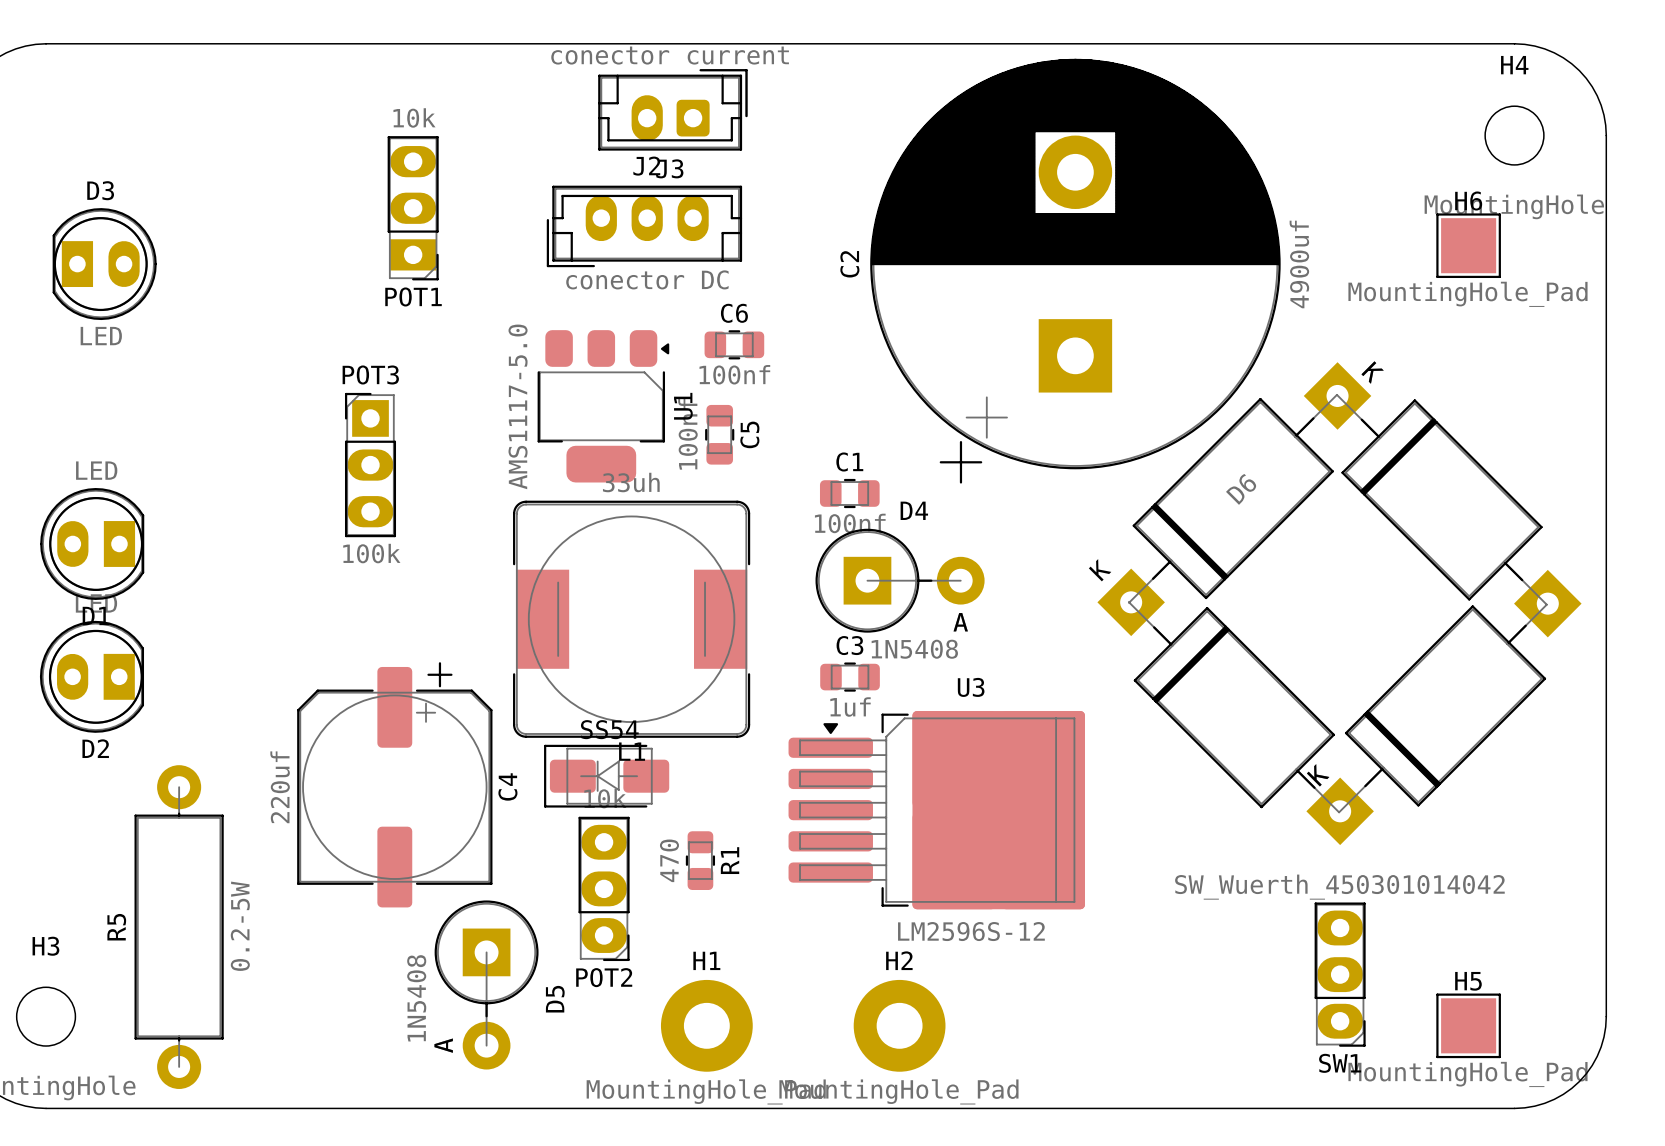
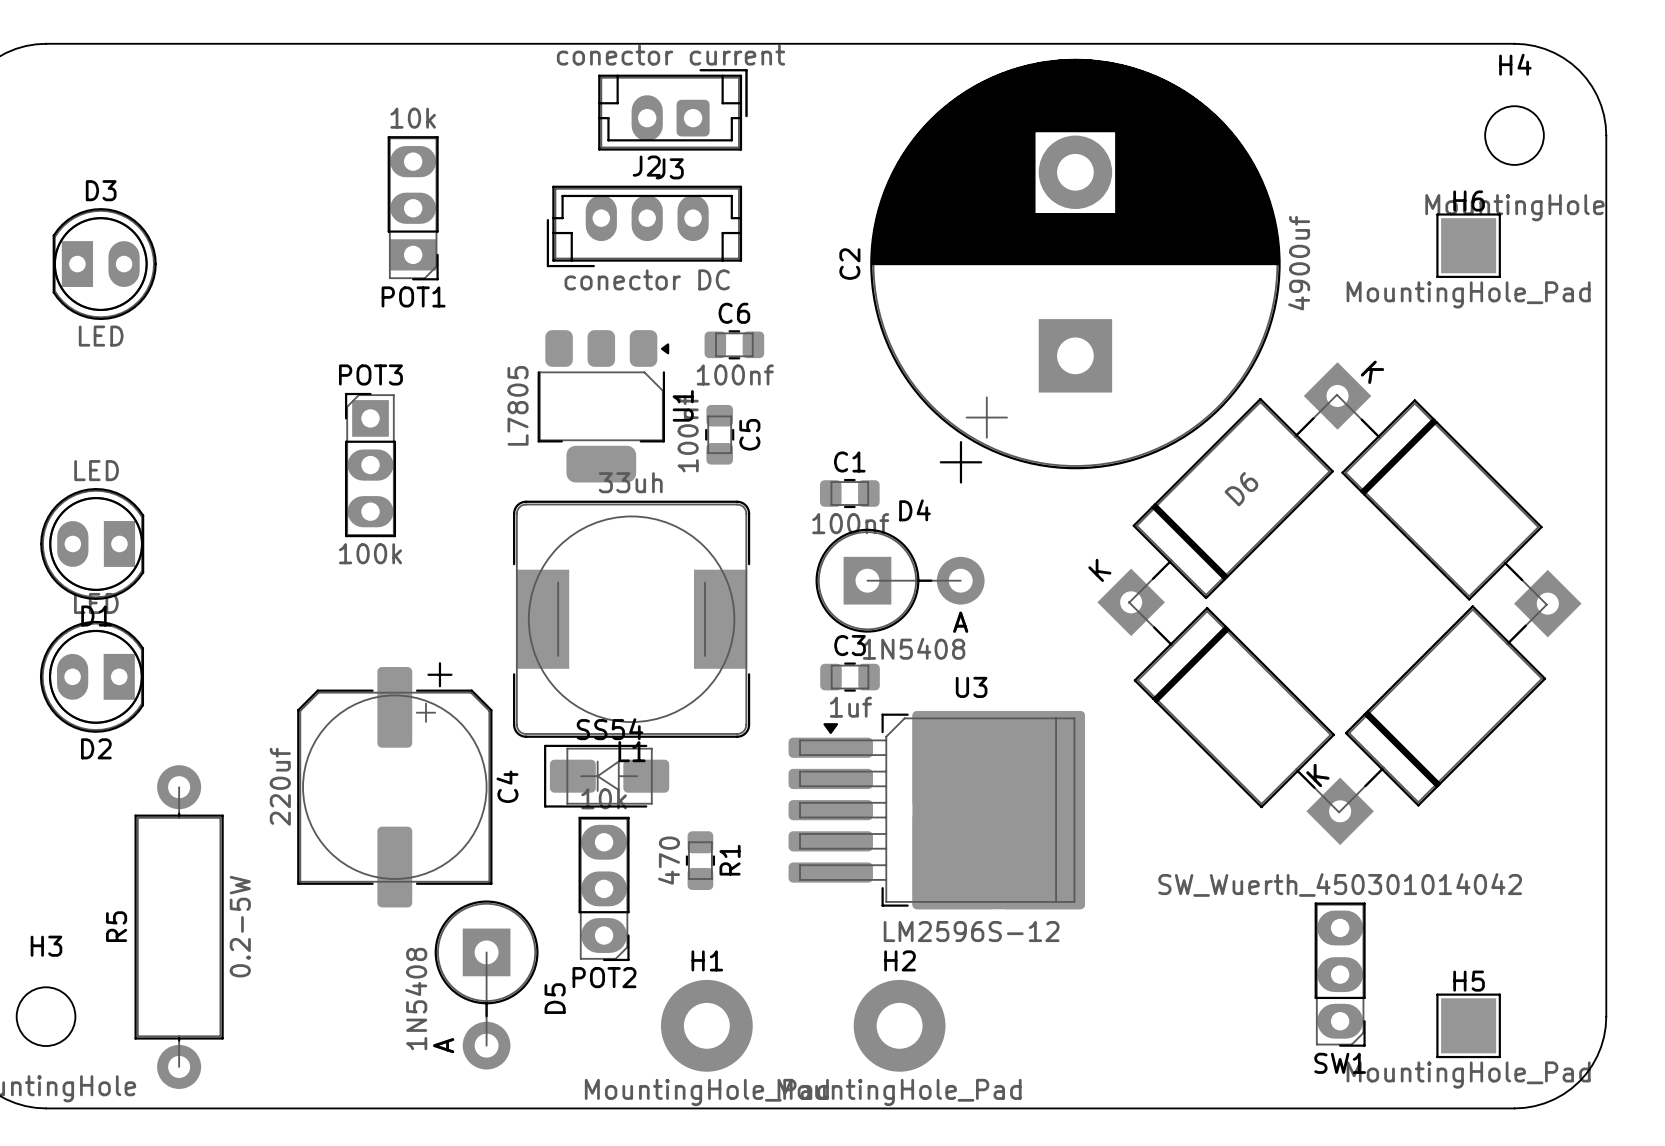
U1 value: AMS1117-5.0 (518, 406) -> L7805 (518, 405)

